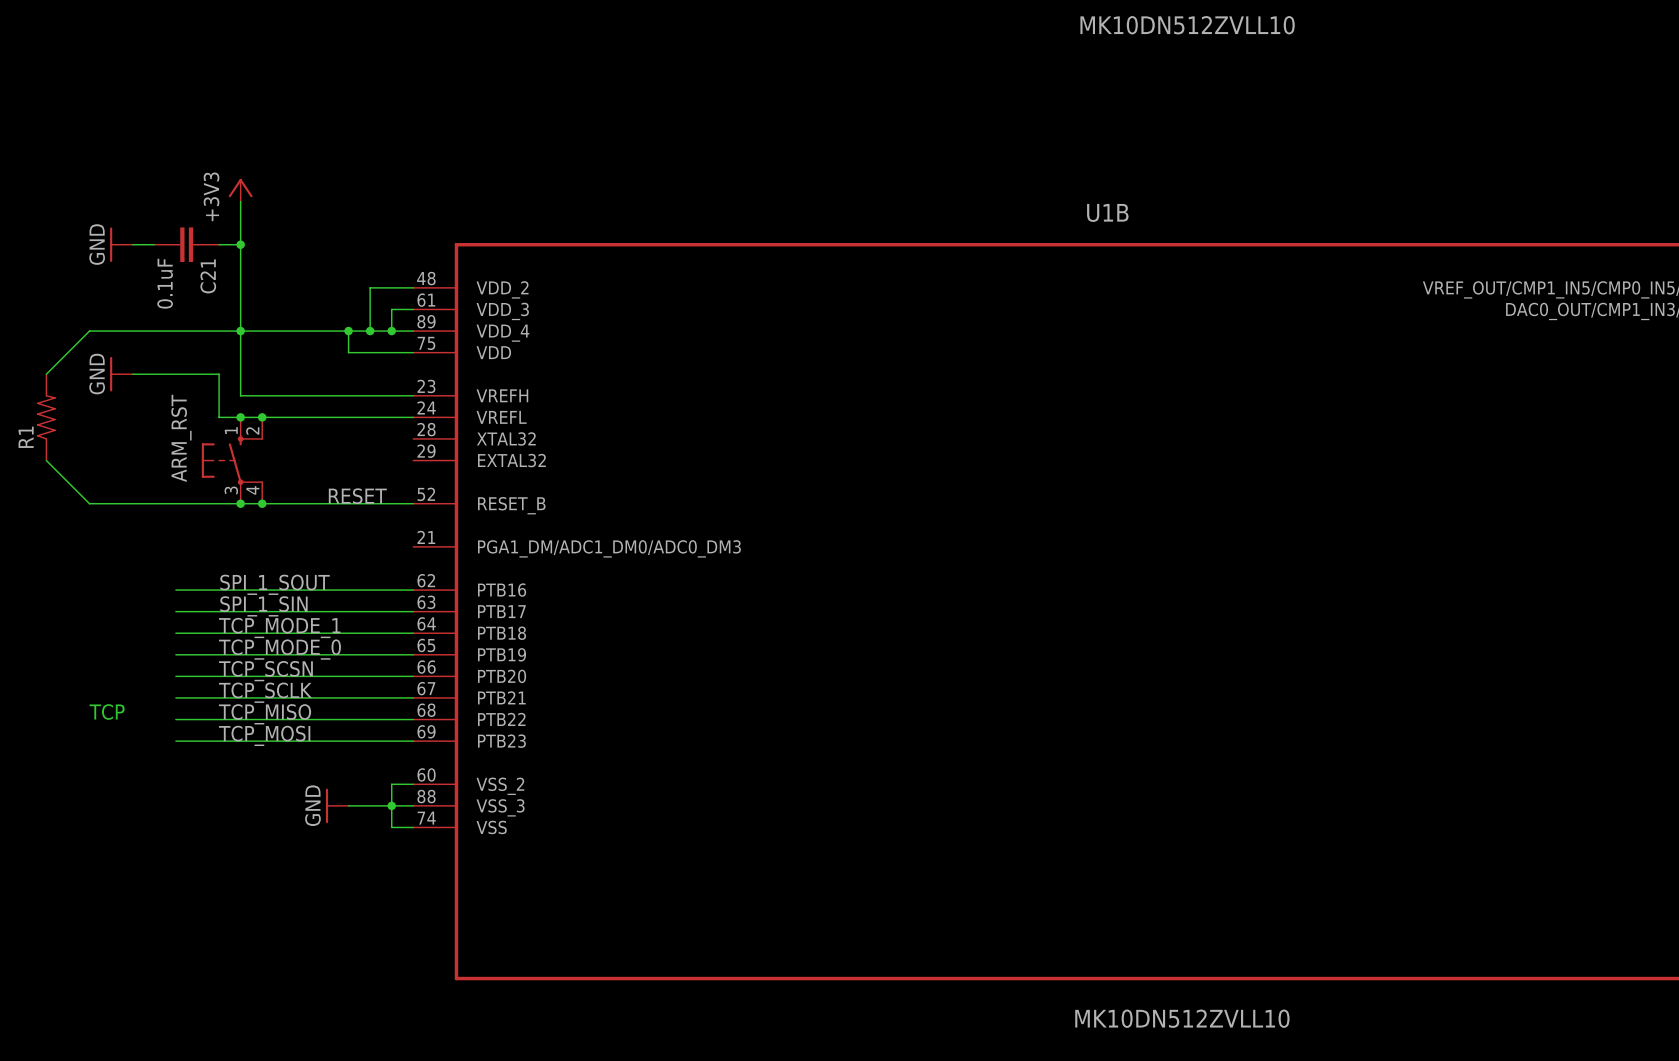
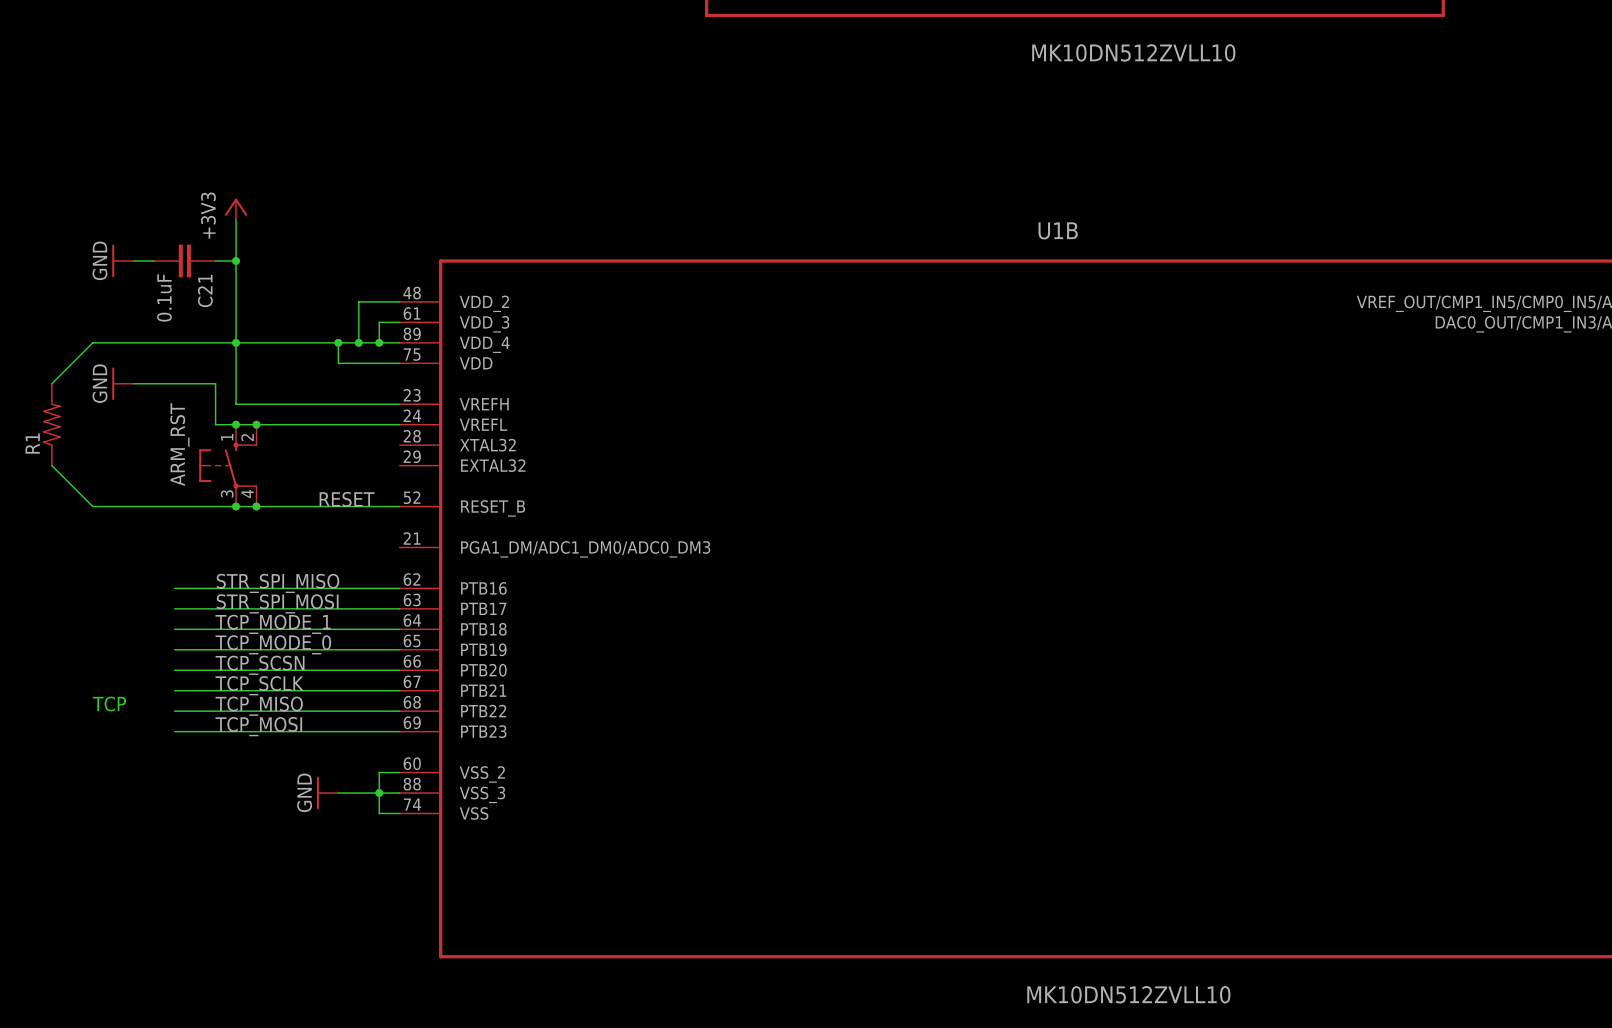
label: SPI_1_SOUT (275, 584) -> STR_SPI_MISO (278, 583)
label: SPI_1_SIN (263, 606) -> STR_SPI_MOSI (277, 603)

